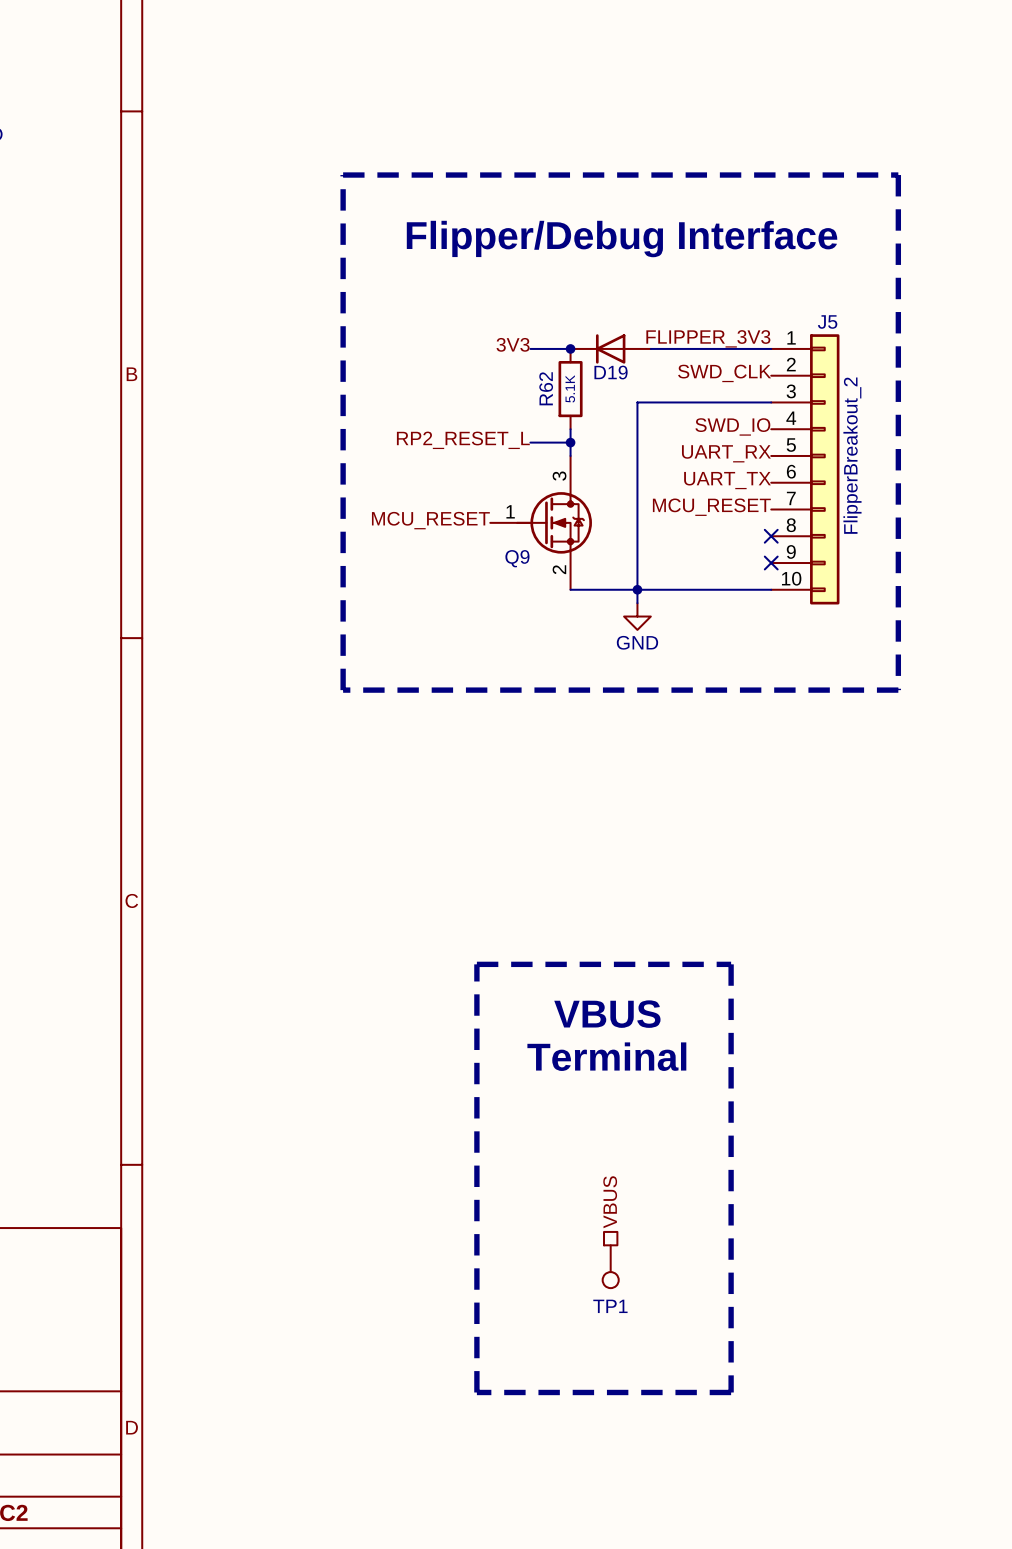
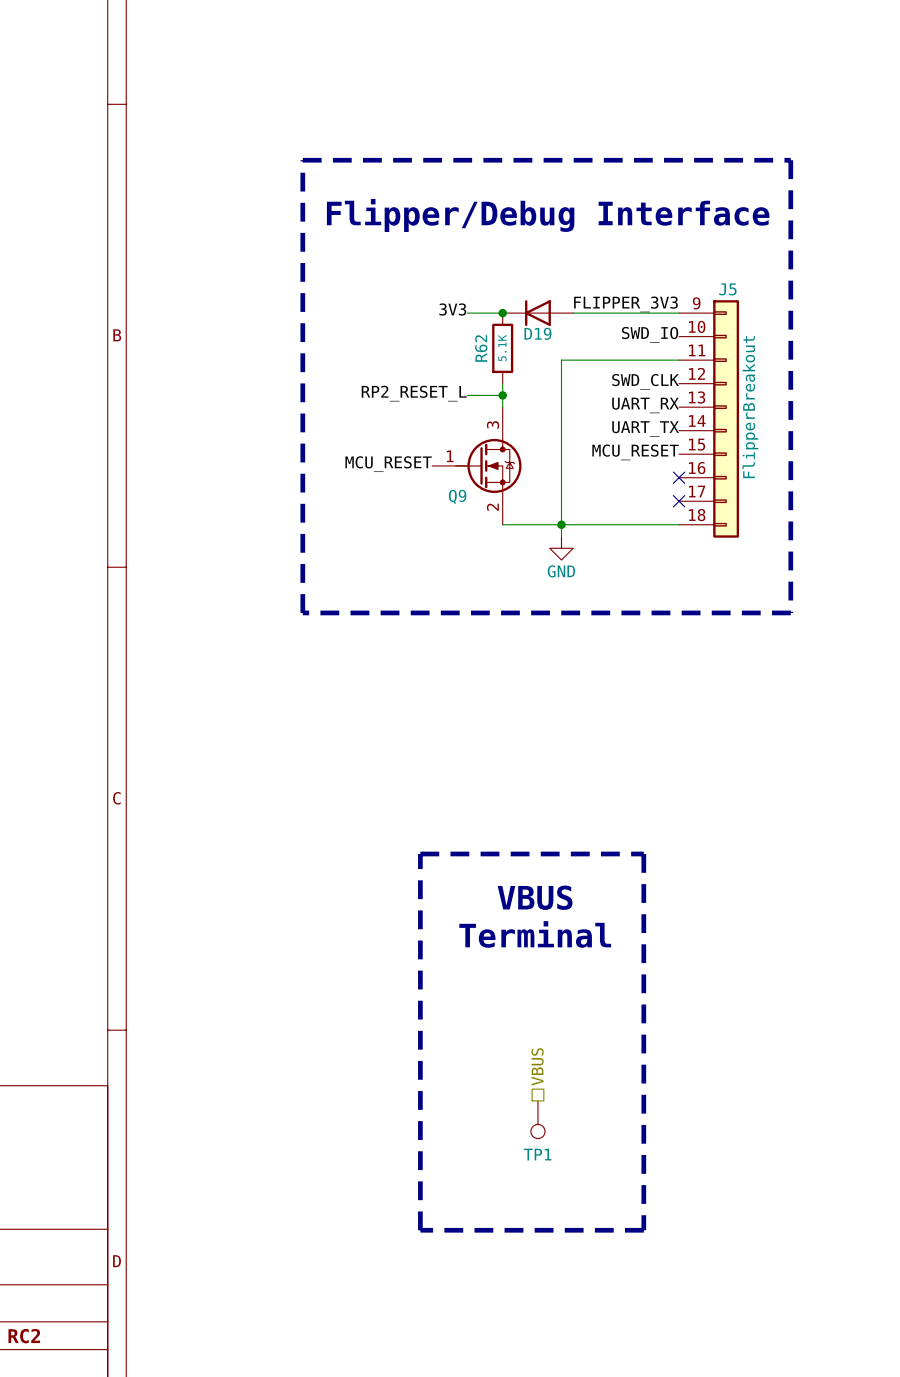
J5 symbol: [771, 334, 840, 605] -> [679, 300, 740, 538]
label: SWD_CLK (724, 373) -> SWD_IO (650, 334)
label: SWD_IO (732, 426) -> SWD_CLK (645, 381)
J5 value: FlipperBreakout_2 (852, 455) -> FlipperBreakout (750, 407)

